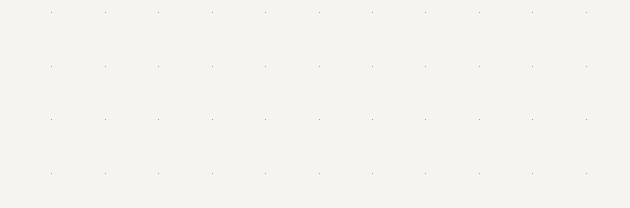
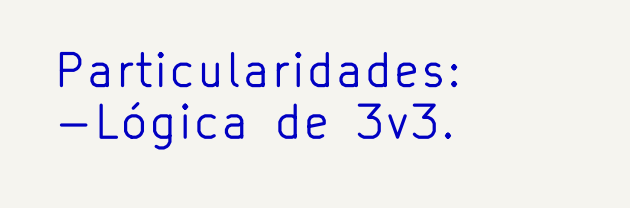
text: none -> Particularidades: (258, 69)
text: none -> -Lógica de 3v3. (255, 125)

